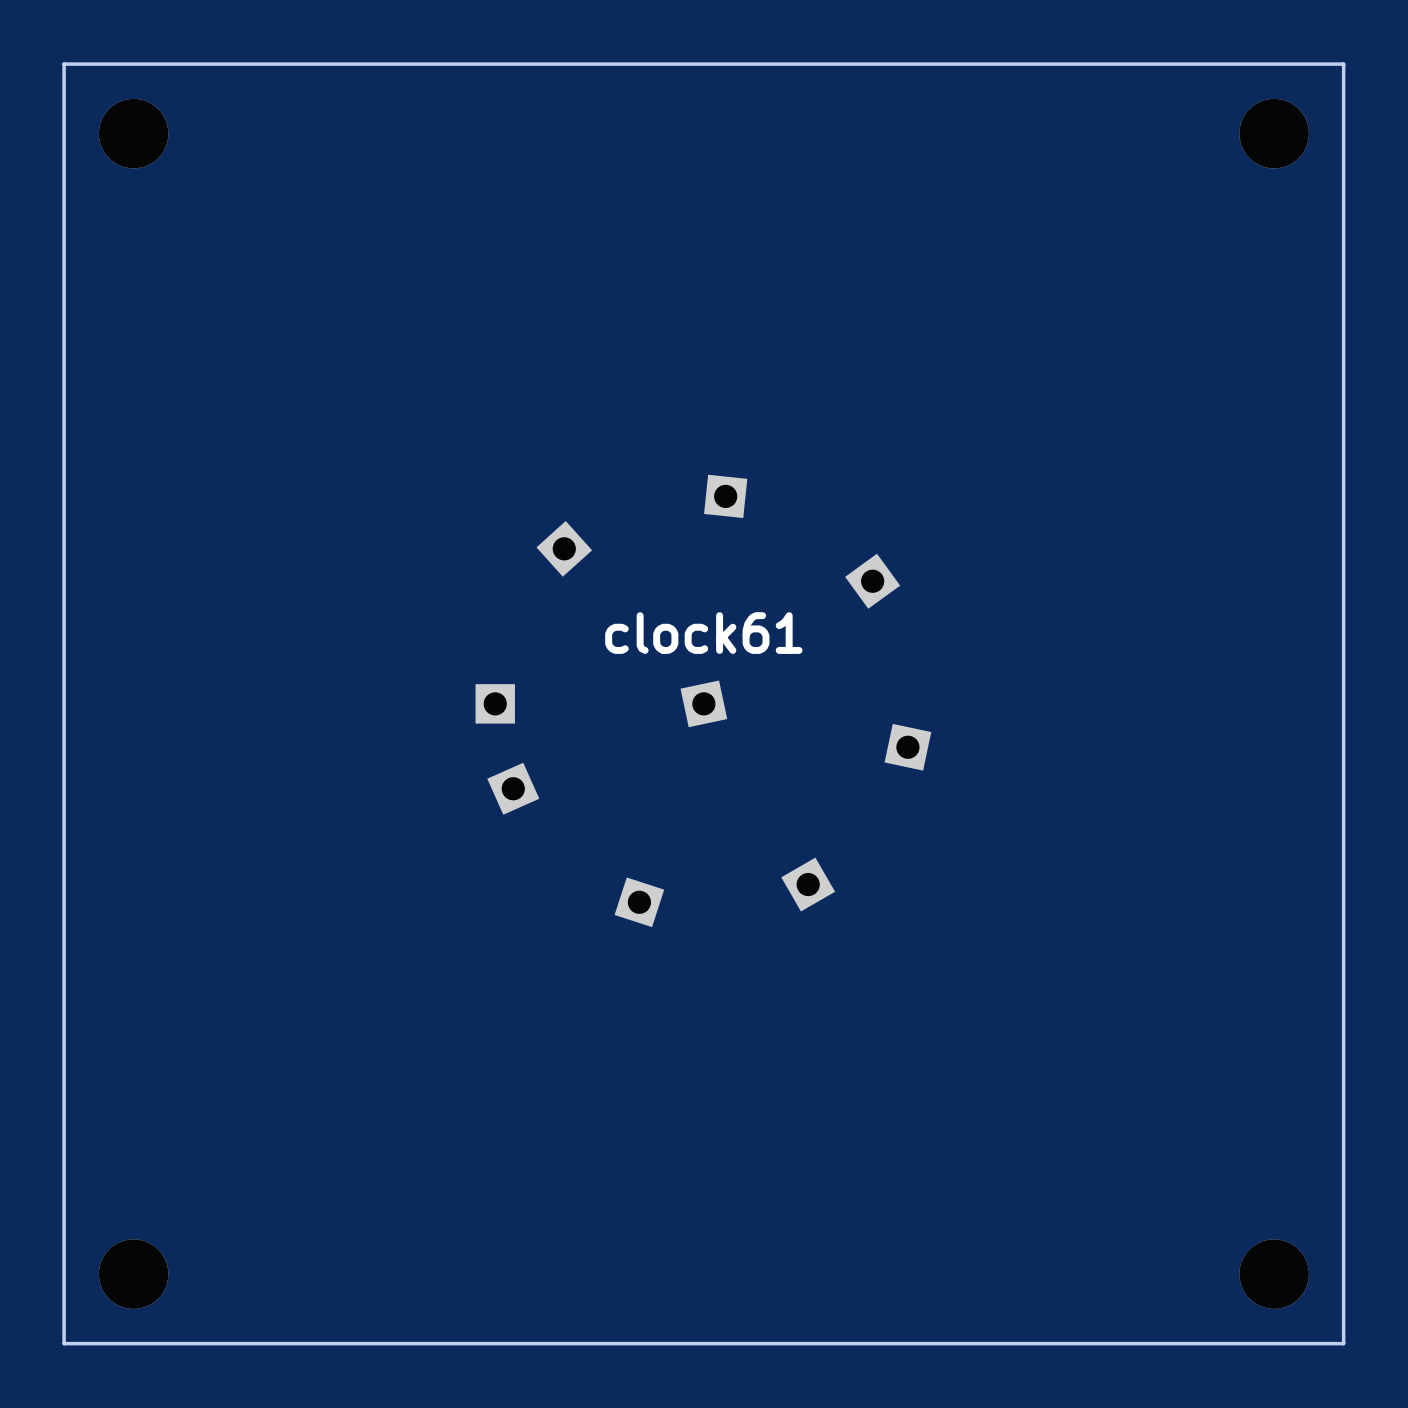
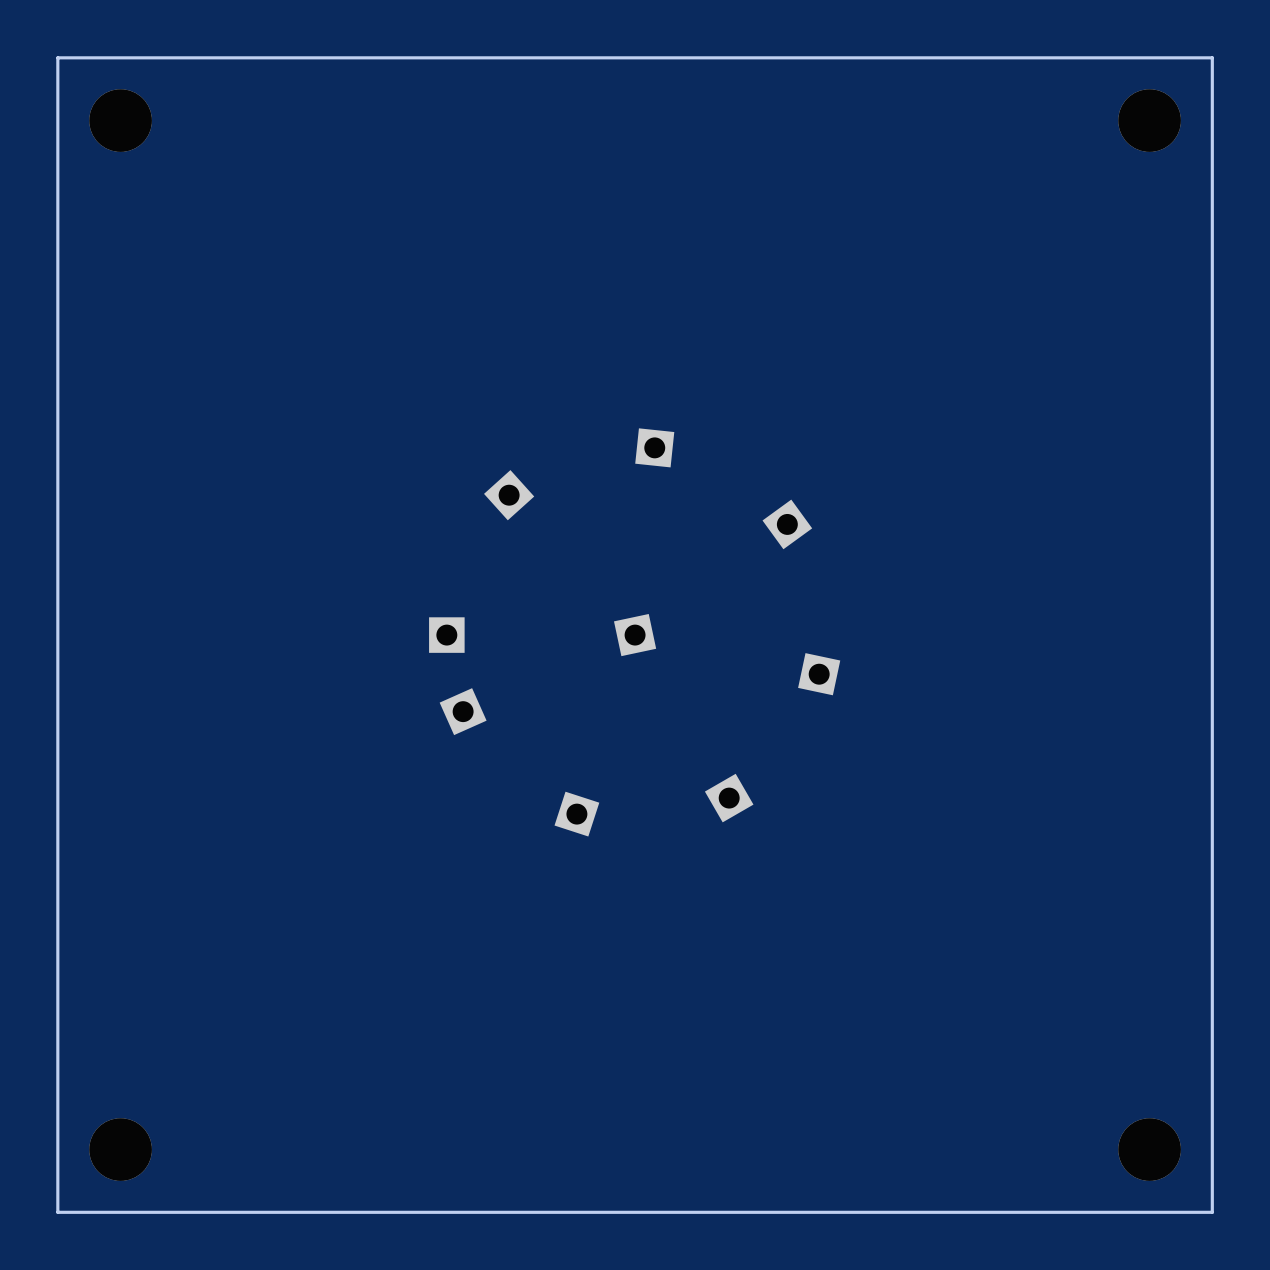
text: clock61 (703, 633) -> none

